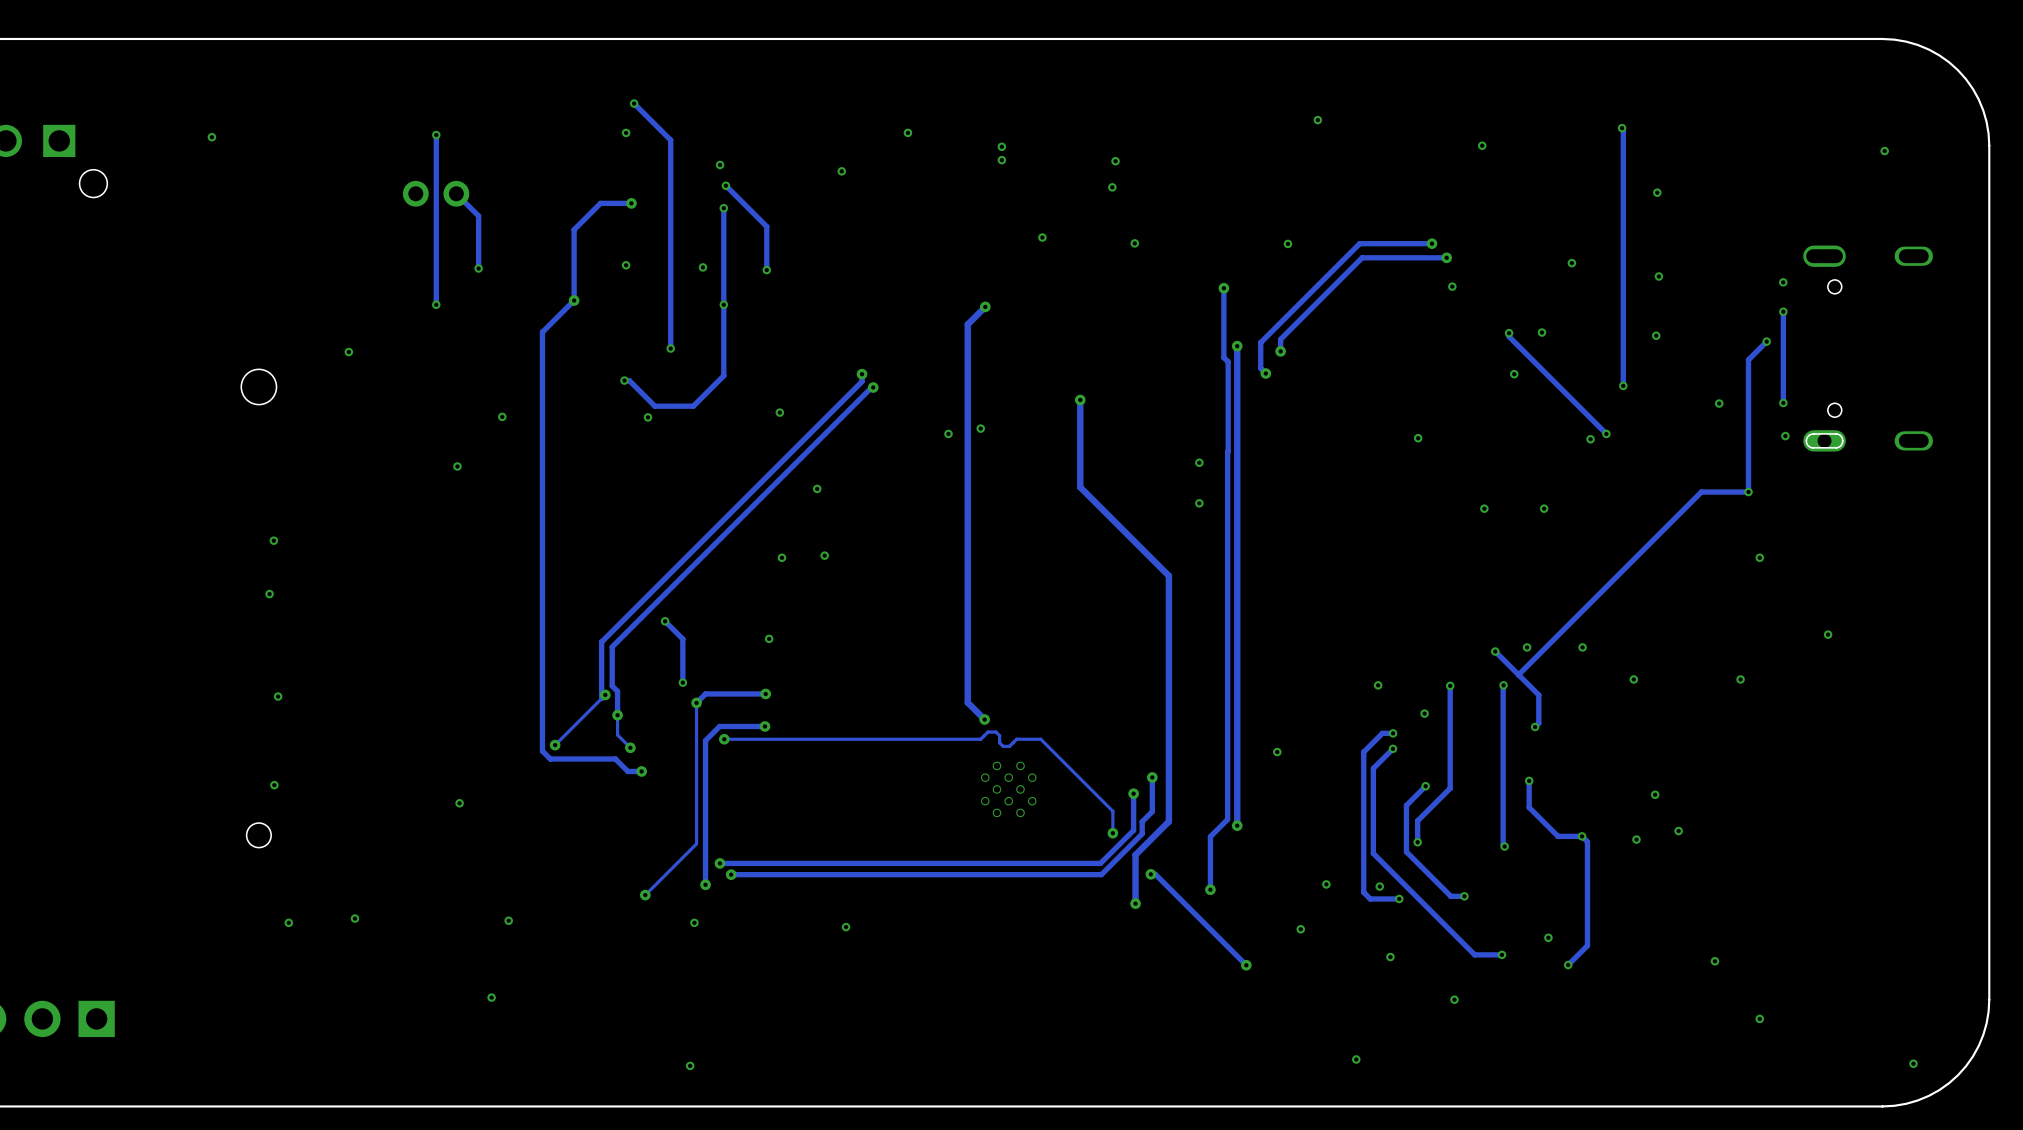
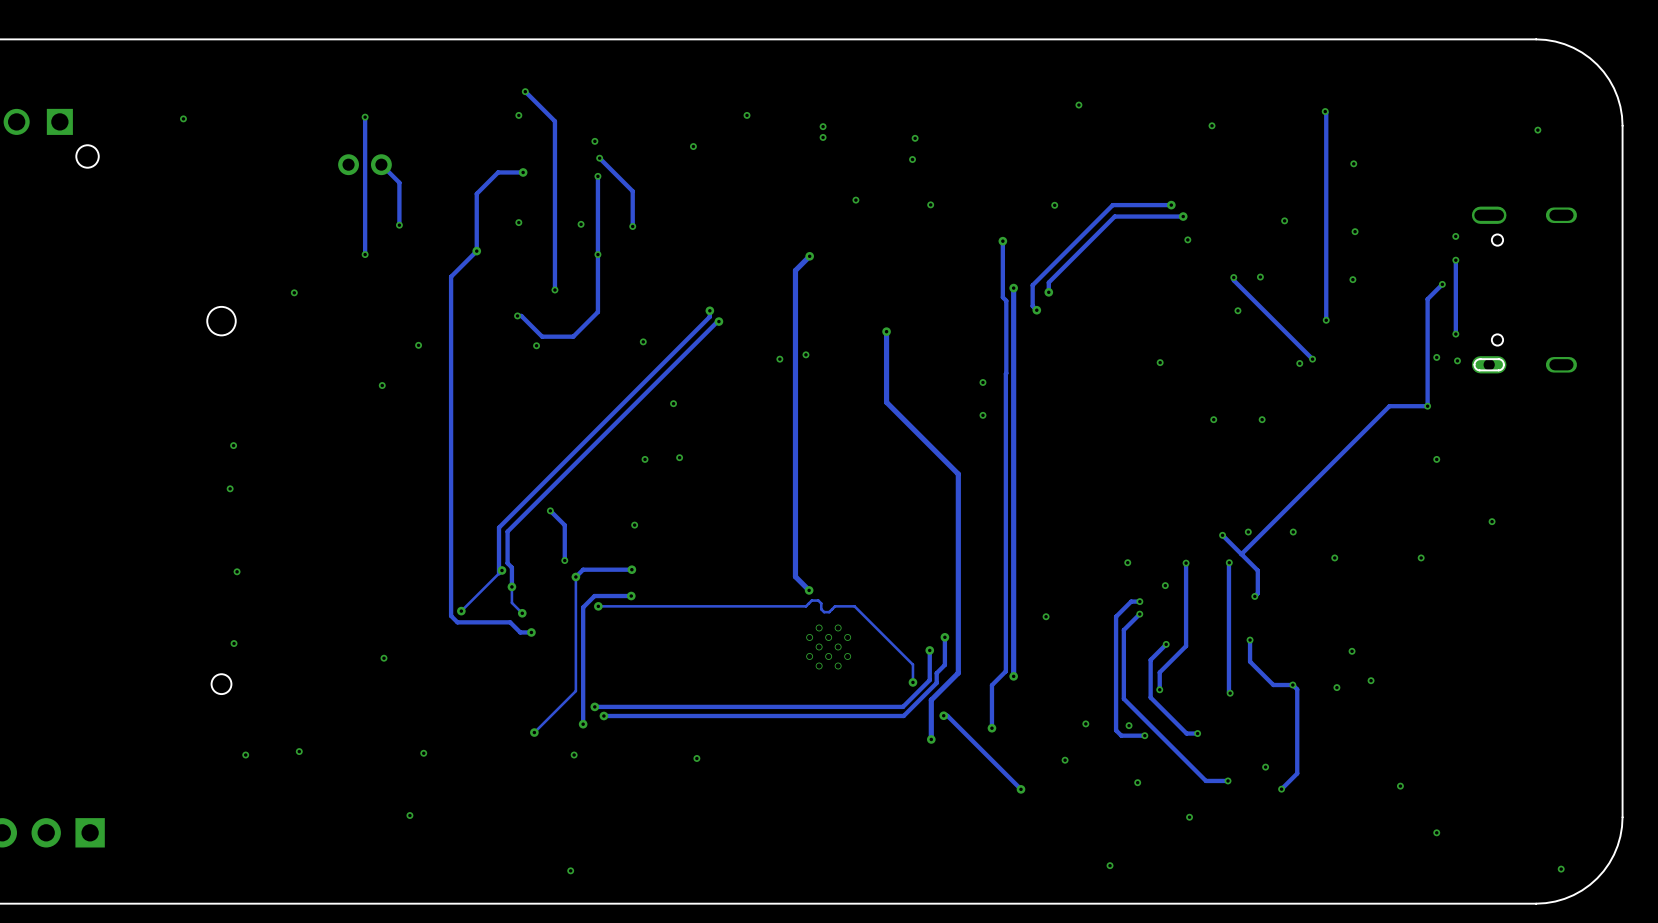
via position: (1719, 403) -> (1436, 357)

